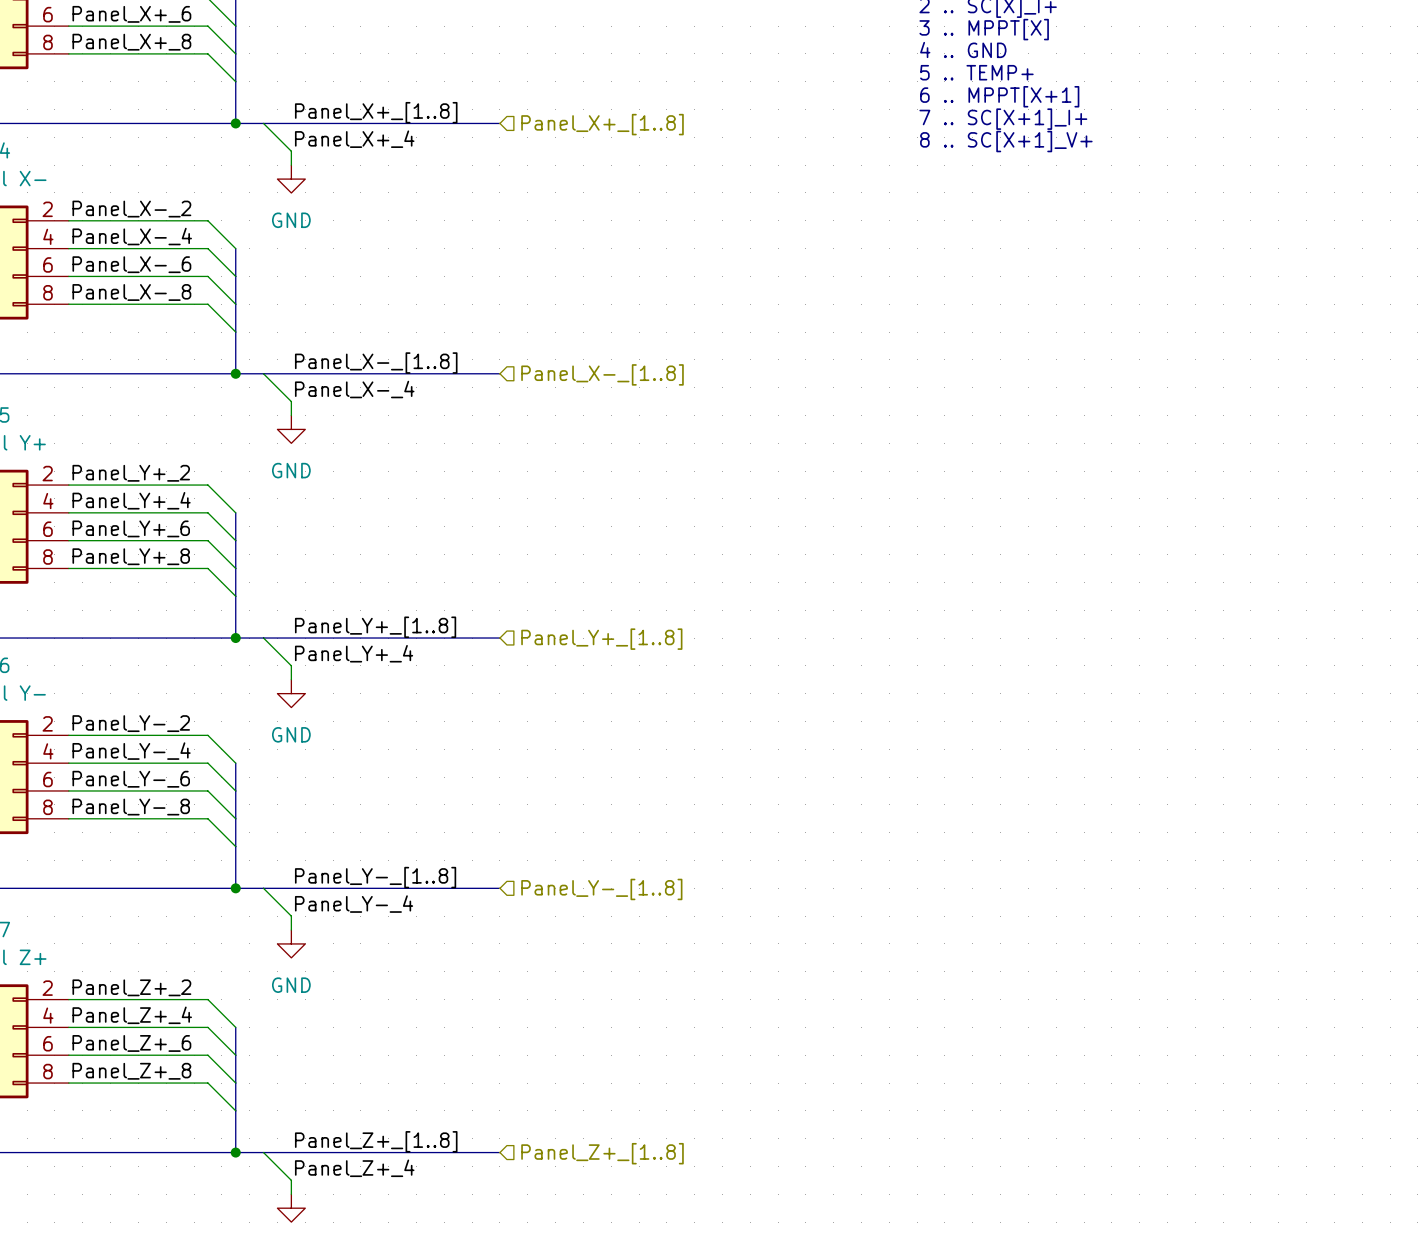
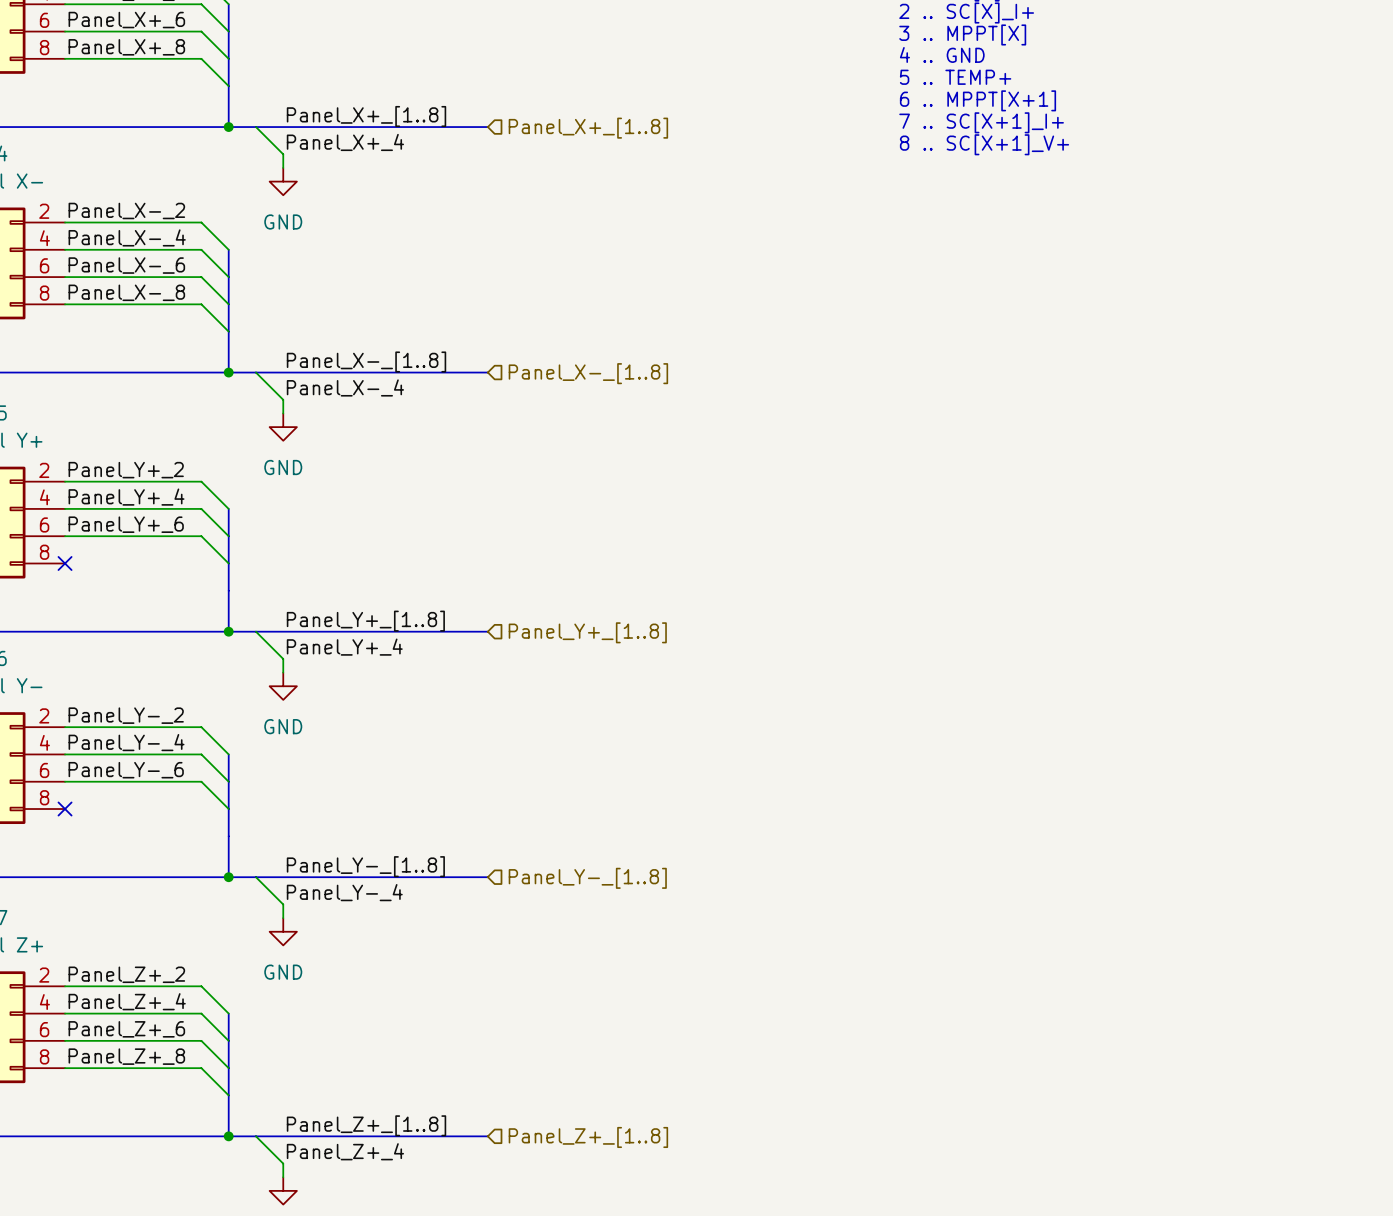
label: Panel_Y+_8 (131, 556) -> none
wire: (68, 568) (207, 568) (235, 596) -> none
no-connect mark: none -> (65, 563)
label: Panel_Y-_8 (131, 807) -> none
wire: (68, 818) (207, 818) (235, 846) -> none
no-connect mark: none -> (65, 809)

